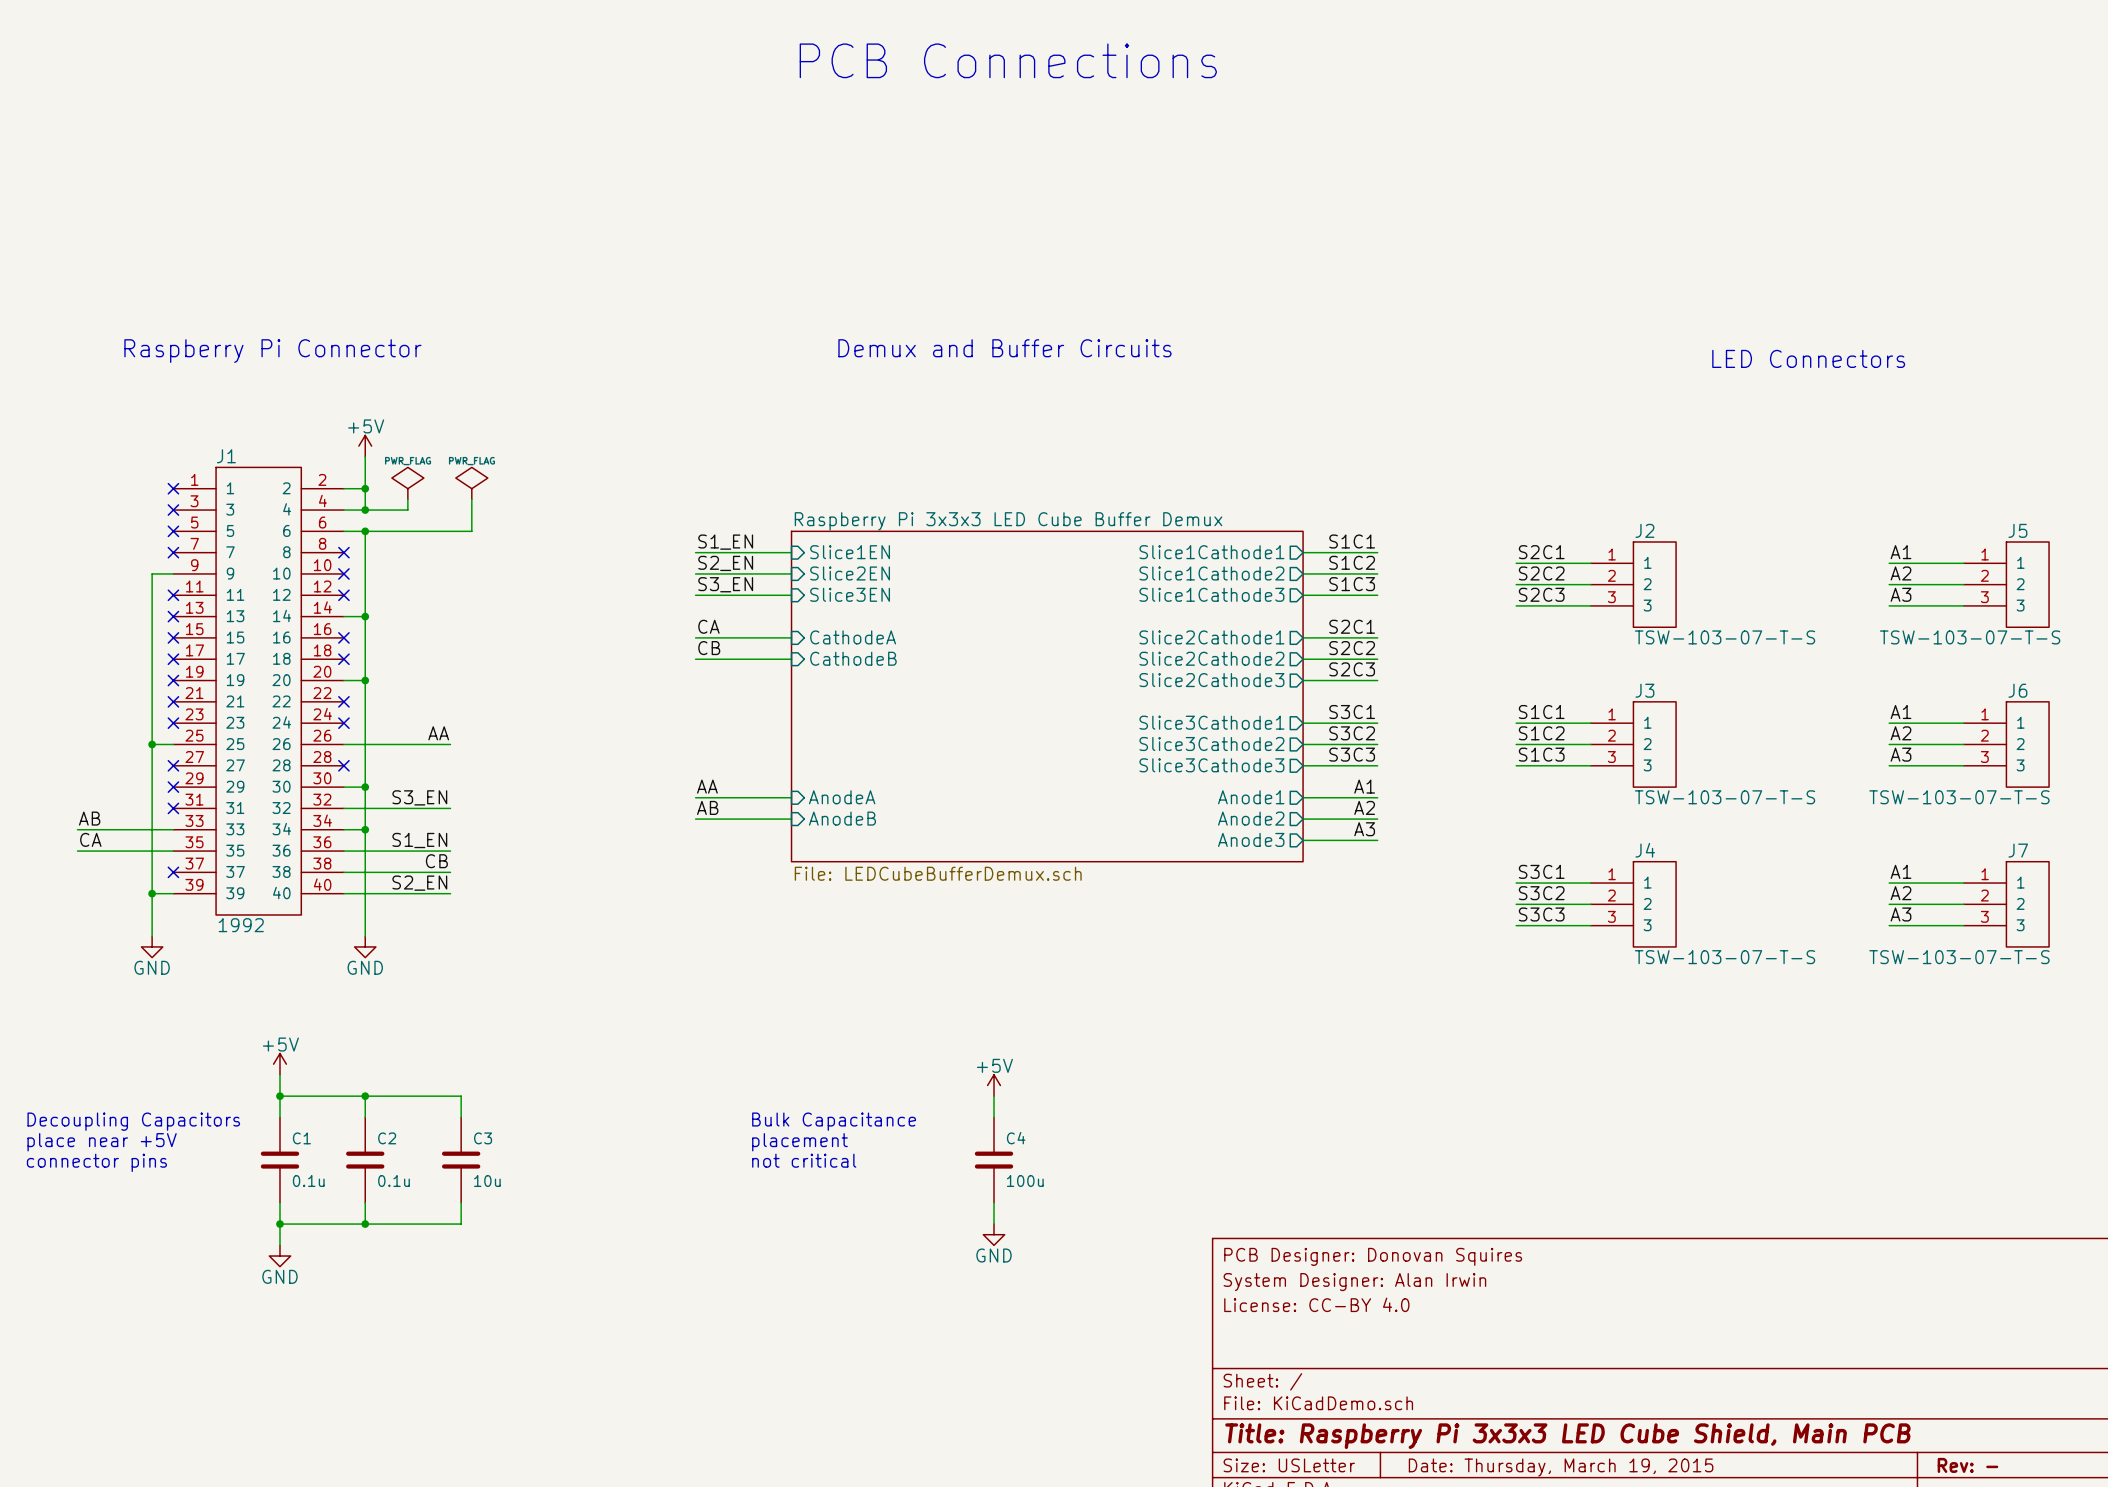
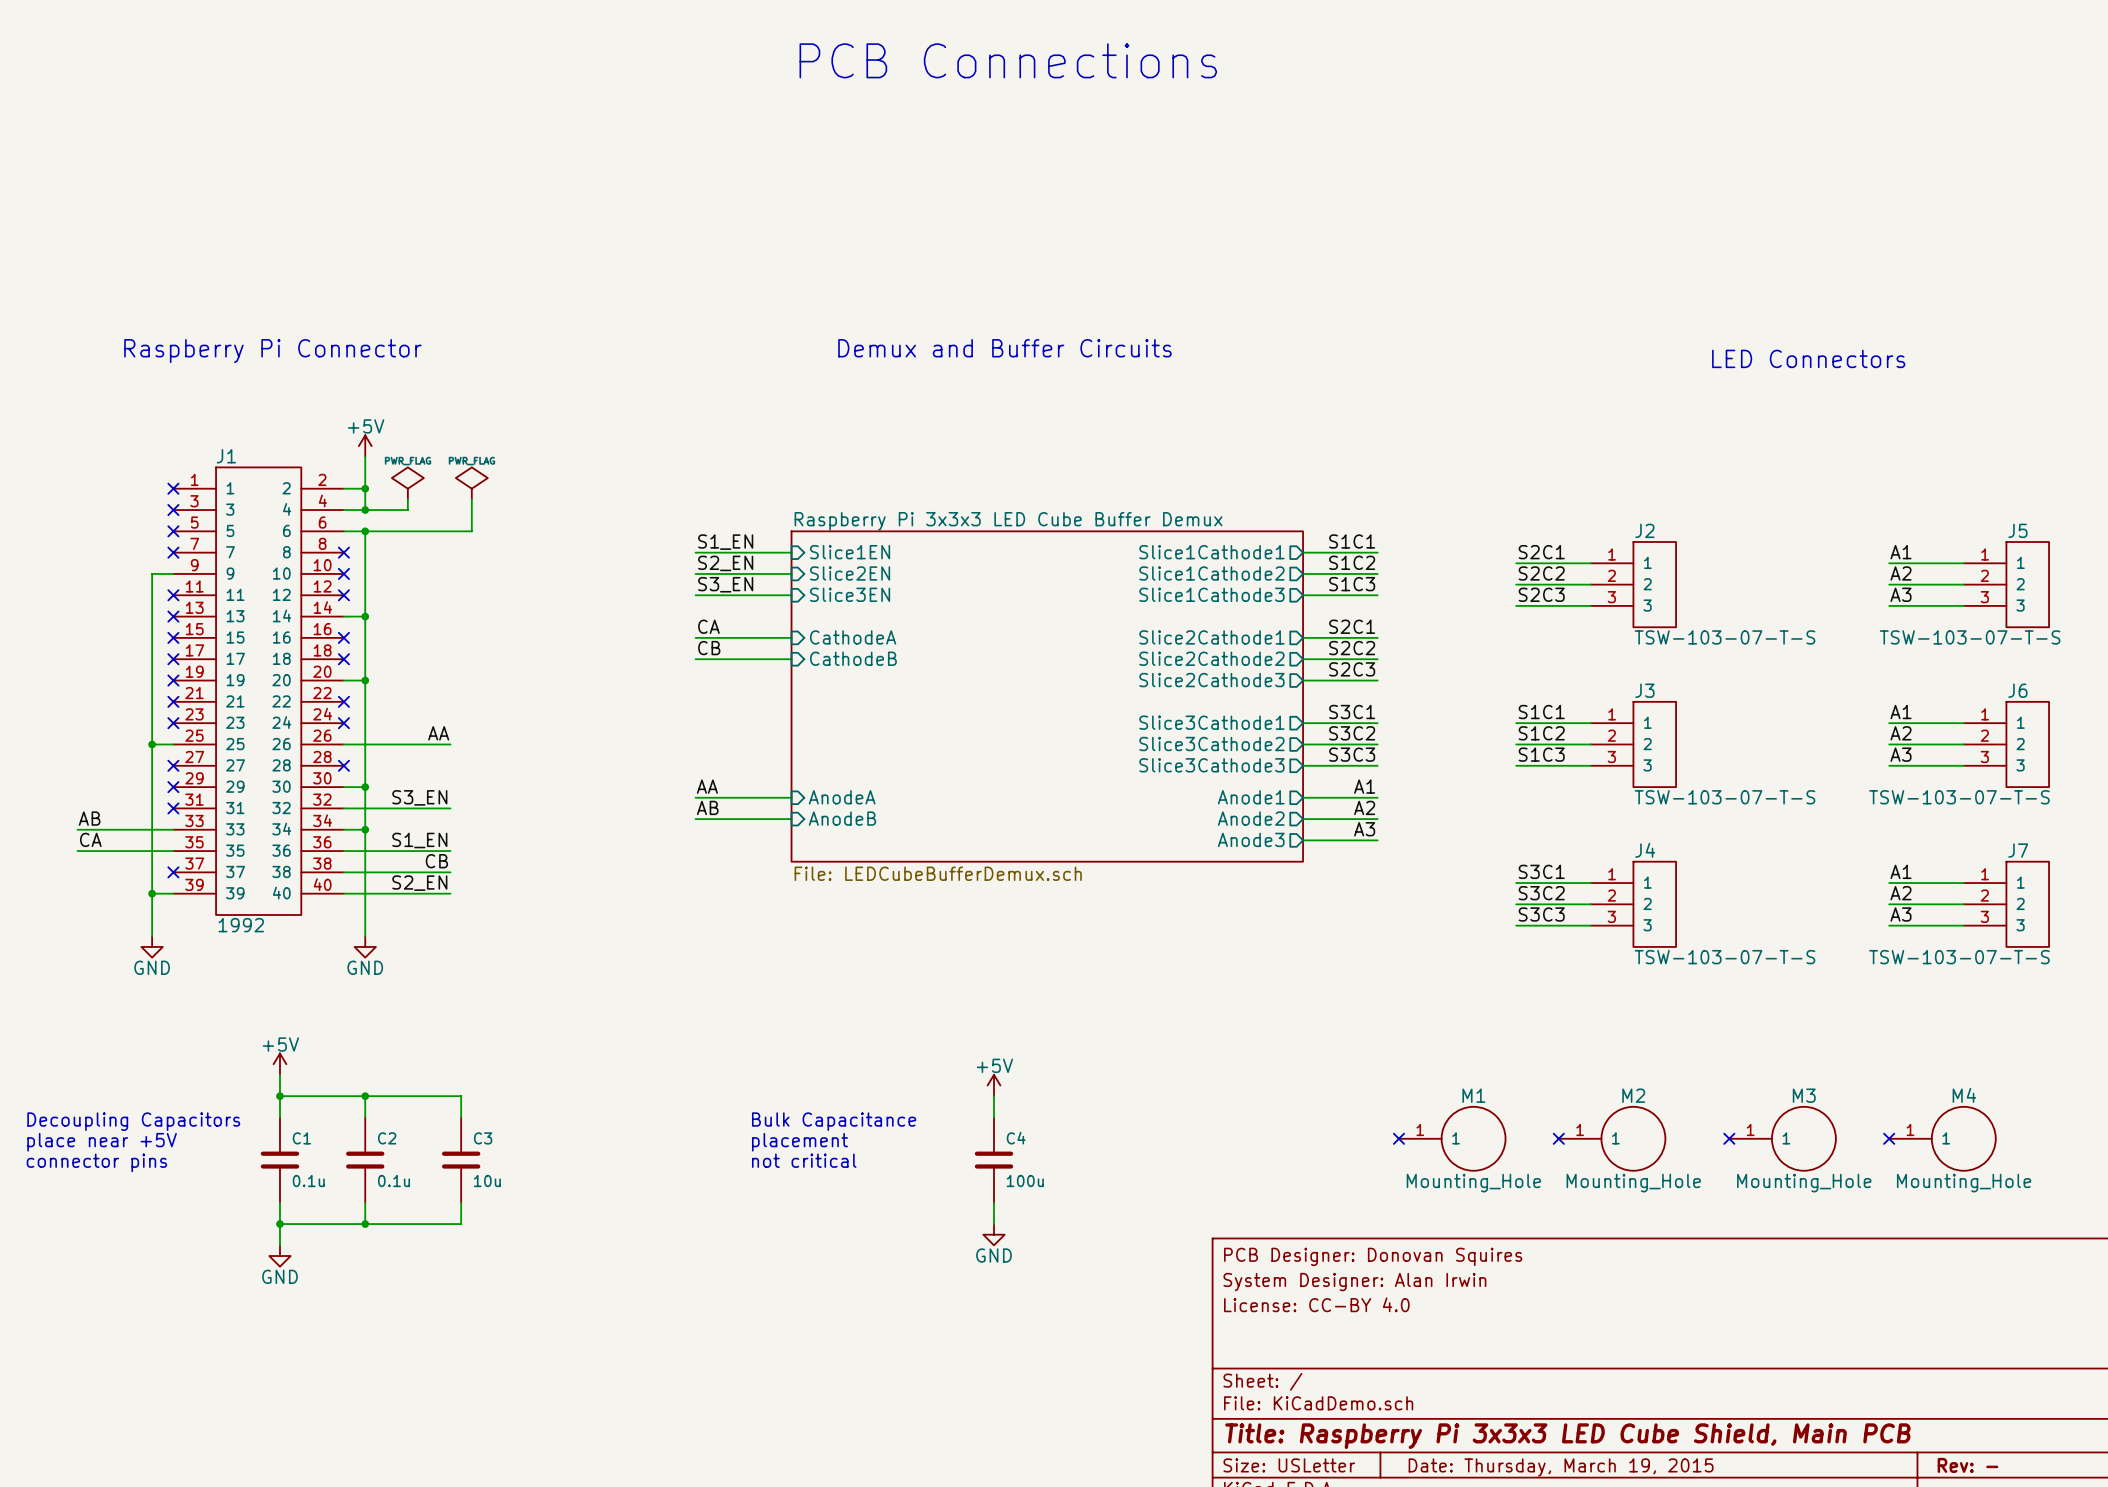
no-connect mark: none -> (1398, 1138)
M1: none -> Mounting_Hole (1452, 1138)
no-connect mark: none -> (1558, 1138)
M2: none -> Mounting_Hole (1612, 1138)
no-connect mark: none -> (1729, 1138)
M3: none -> Mounting_Hole (1782, 1138)
no-connect mark: none -> (1889, 1138)
M4: none -> Mounting_Hole (1942, 1138)

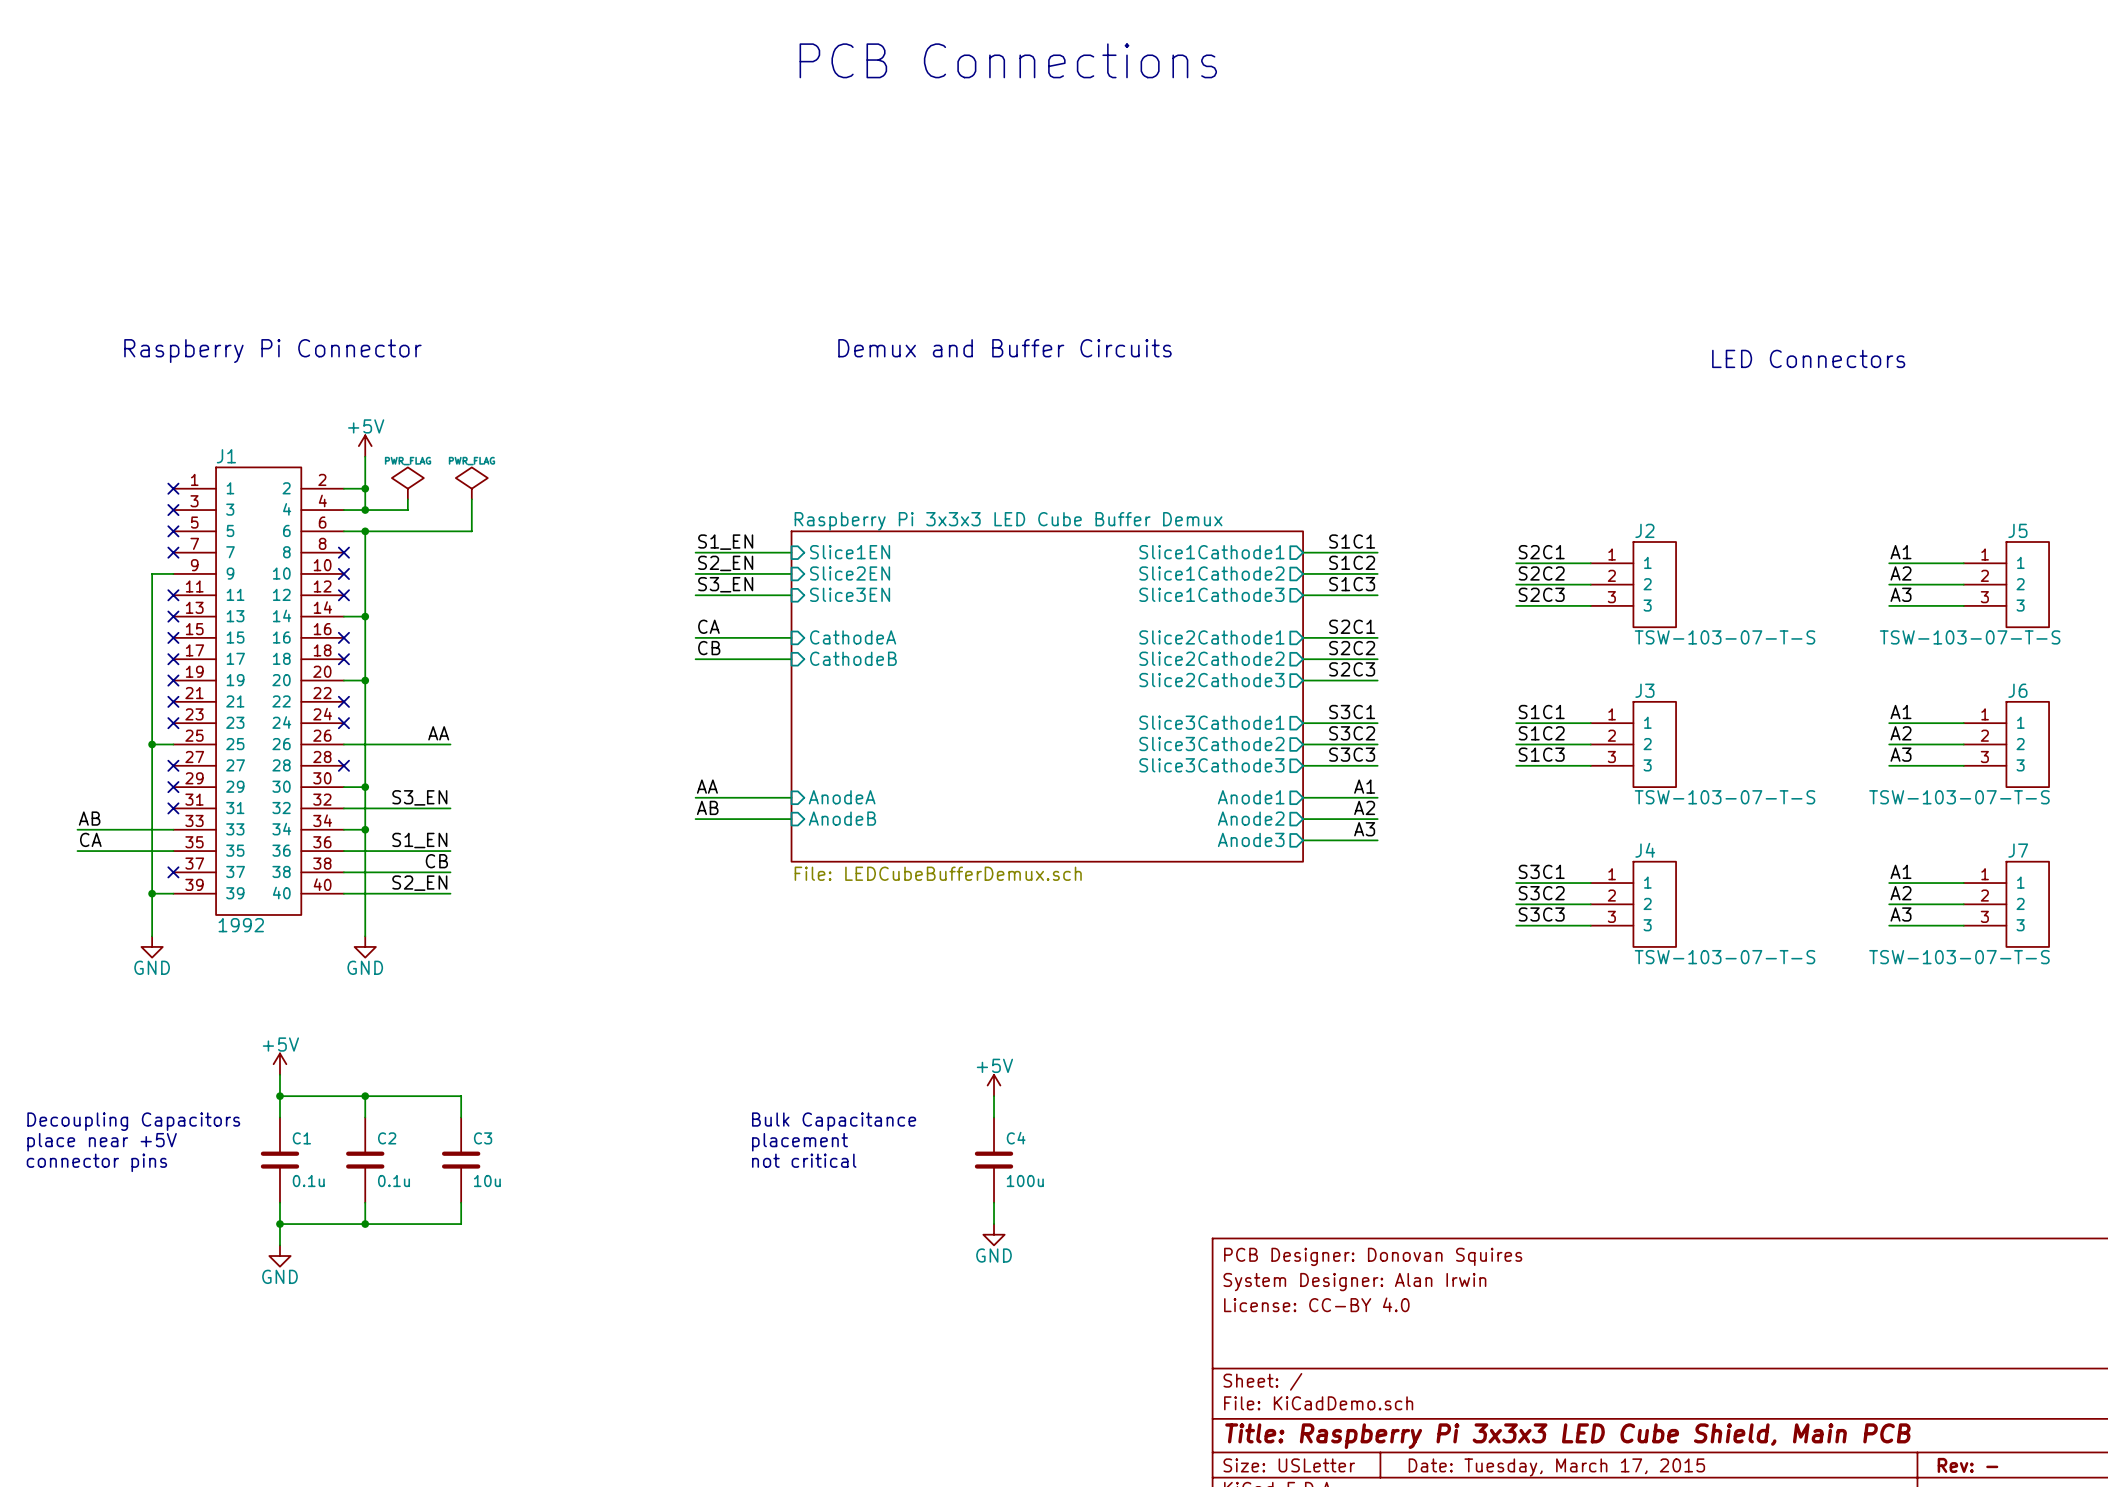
no-connect mark: (1398, 1138) -> none
M1: Mounting_Hole (1452, 1138) -> none
no-connect mark: (1558, 1138) -> none
M2: Mounting_Hole (1612, 1138) -> none
no-connect mark: (1729, 1138) -> none
M3: Mounting_Hole (1782, 1138) -> none
no-connect mark: (1889, 1138) -> none
M4: Mounting_Hole (1942, 1138) -> none
title block: Date: Thursday, March 19, 2015 (1561, 1467) -> Date: Tuesday, March 17, 2015 (1556, 1467)

